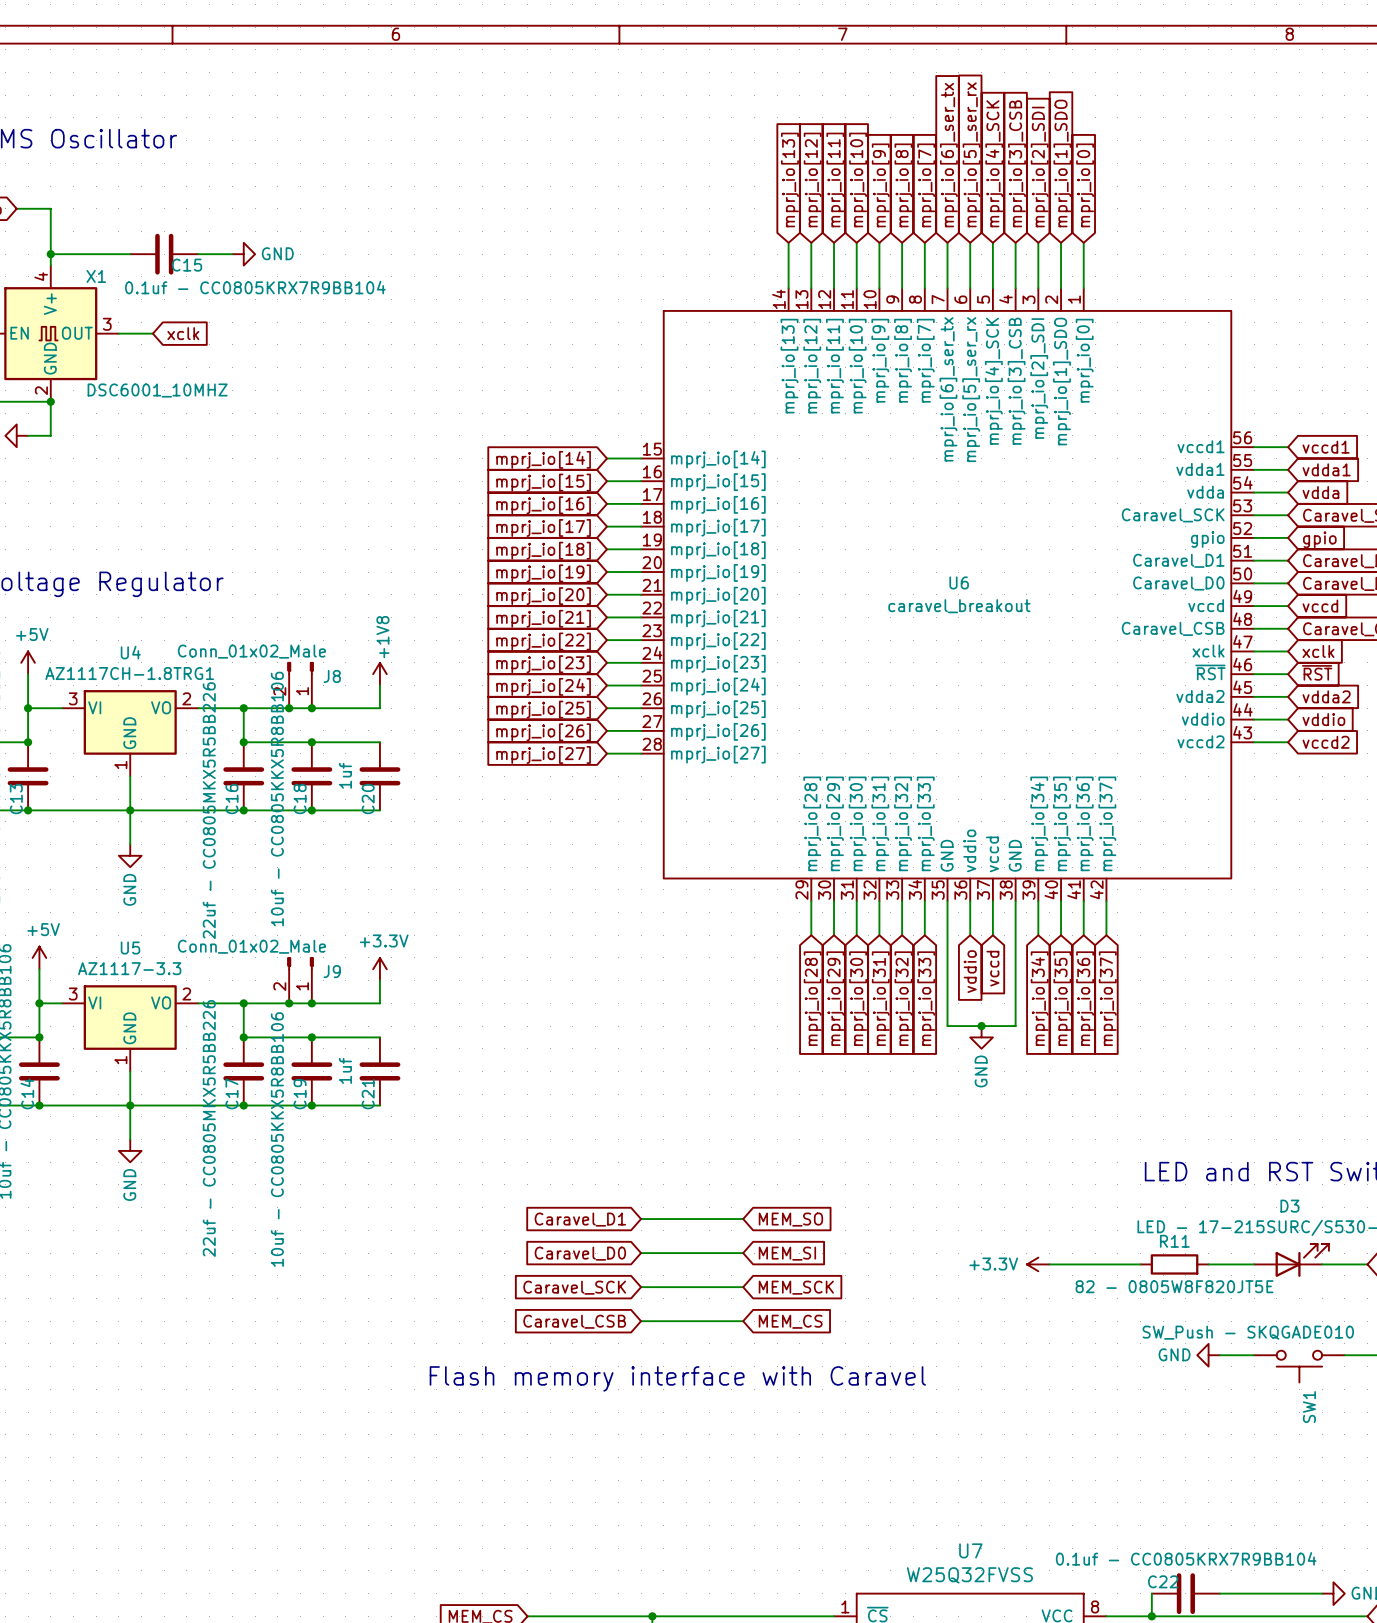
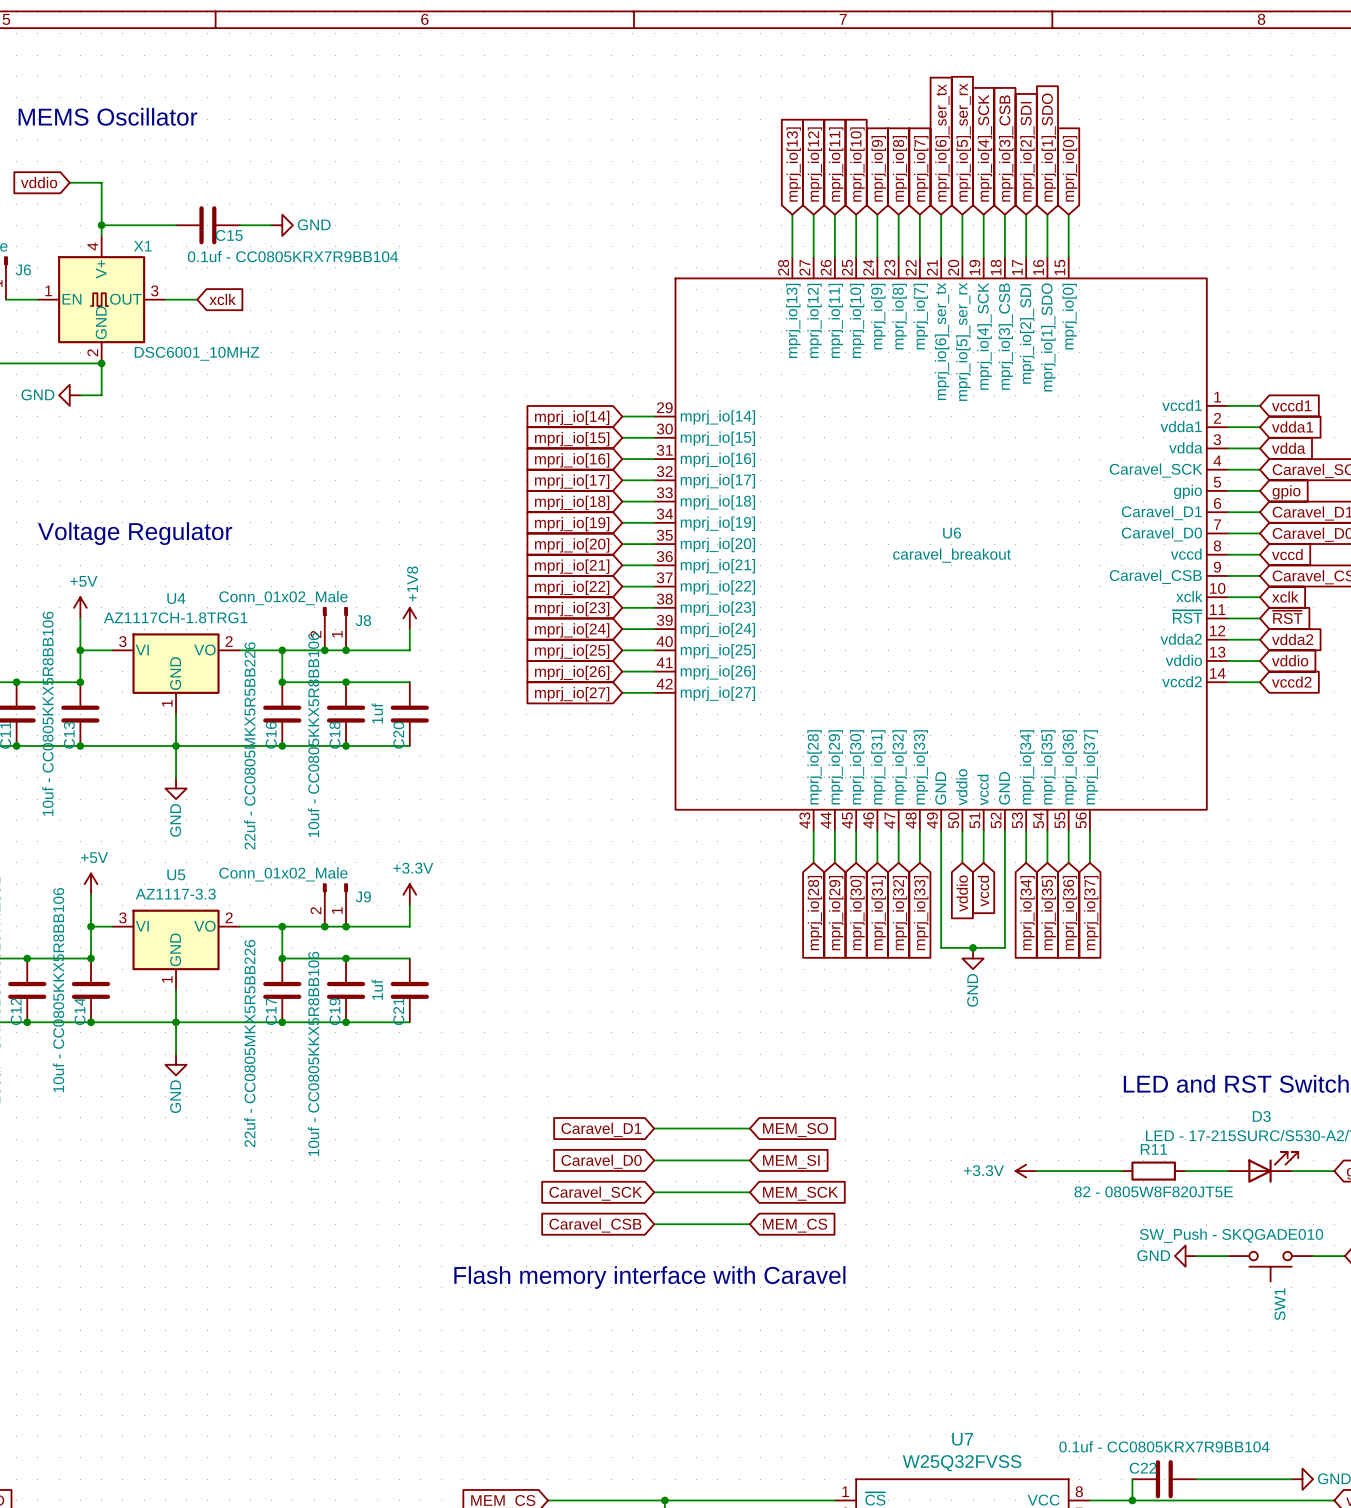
U6 symbol: [641, 288, 1255, 902] -> [654, 257, 1229, 832]

